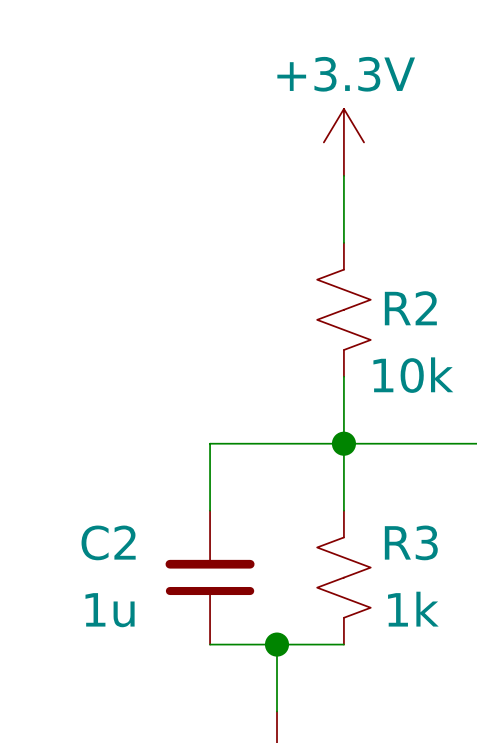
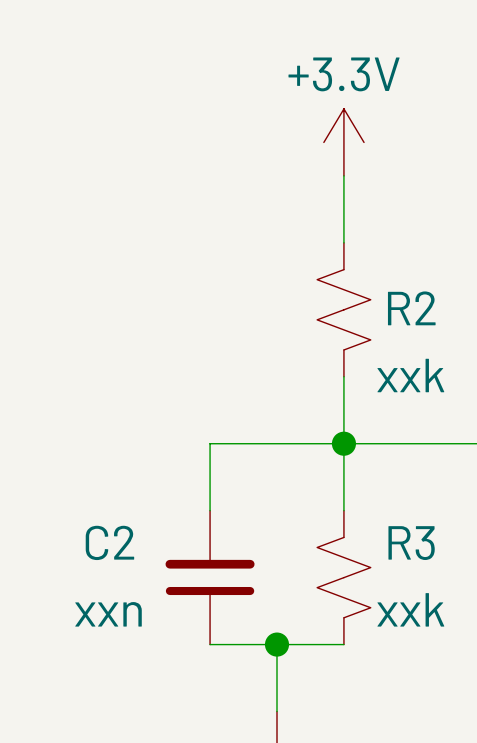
R2 value: 10k (413, 375) -> xxk (410, 375)
R3 value: 1k (413, 609) -> xxk (410, 609)
C2 value: 1u (110, 610) -> xxn (108, 614)

